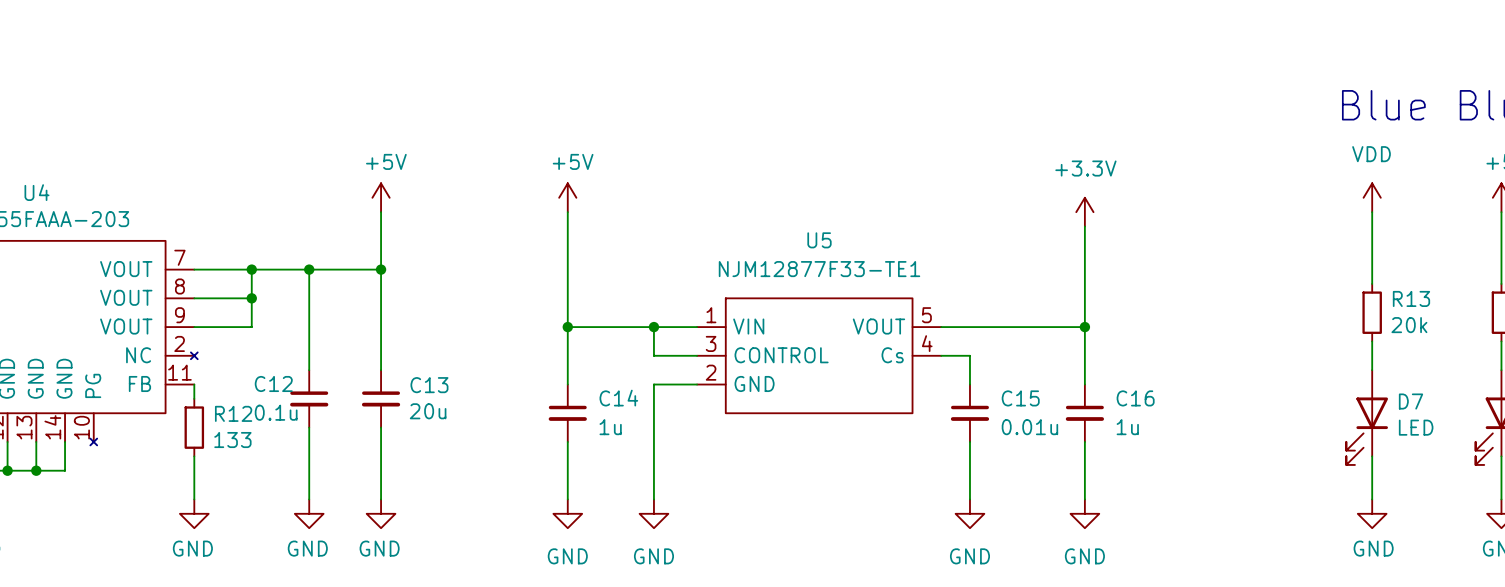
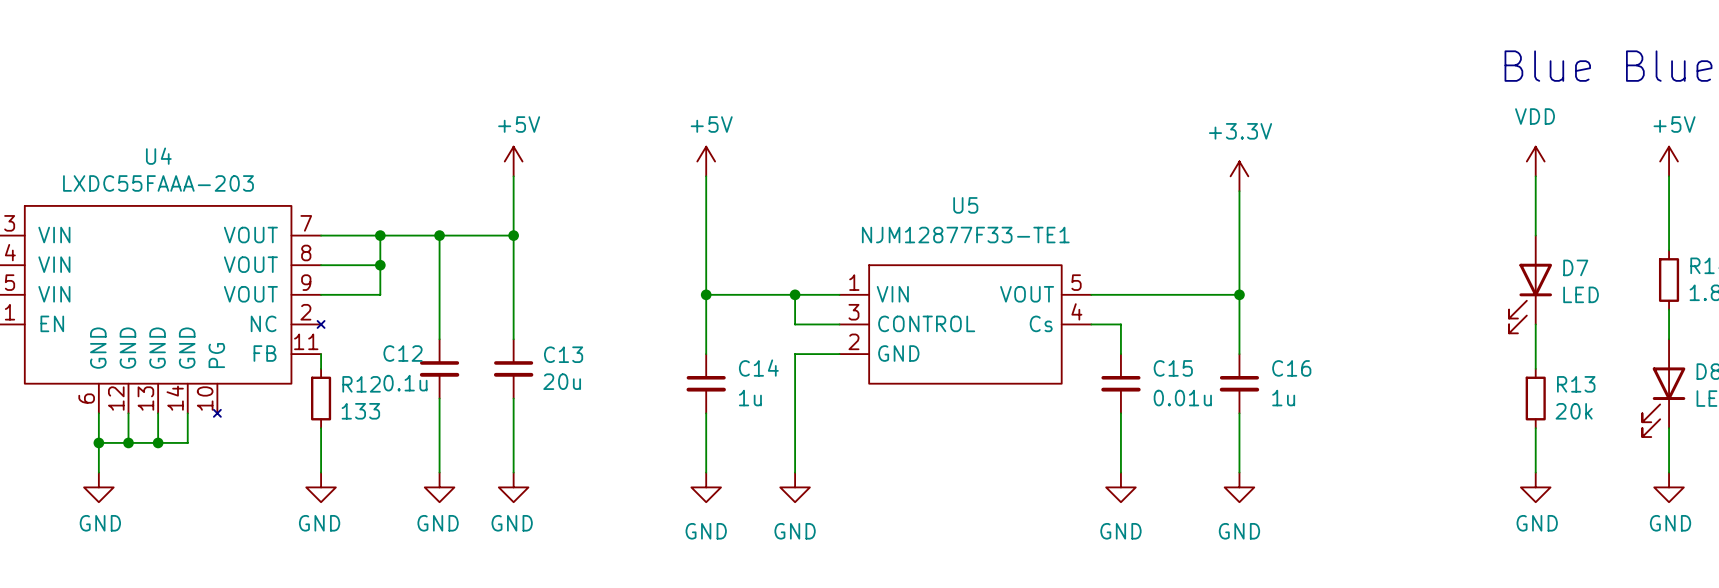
R13 position: (1372, 312) -> (1535, 398)
D7 position: (1367, 417) -> (1530, 284)

